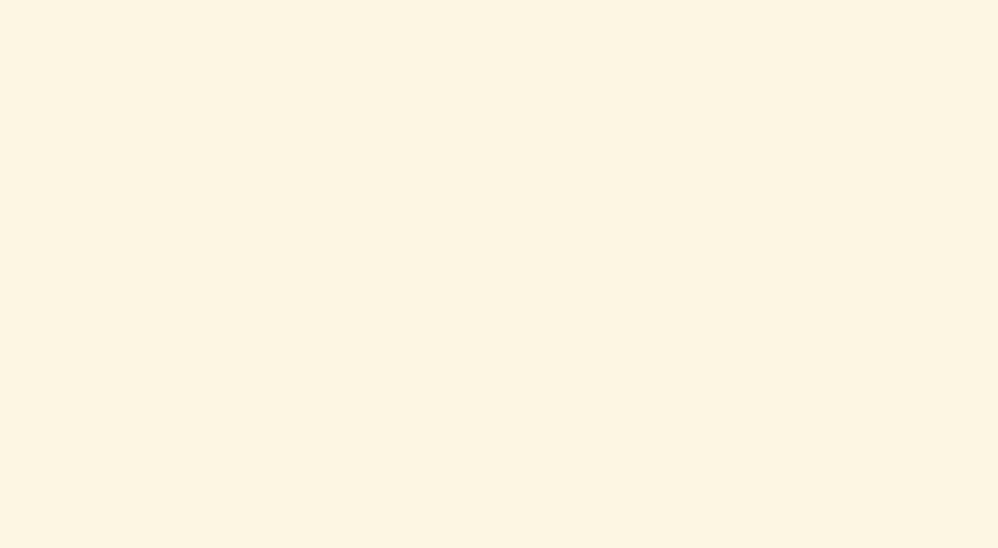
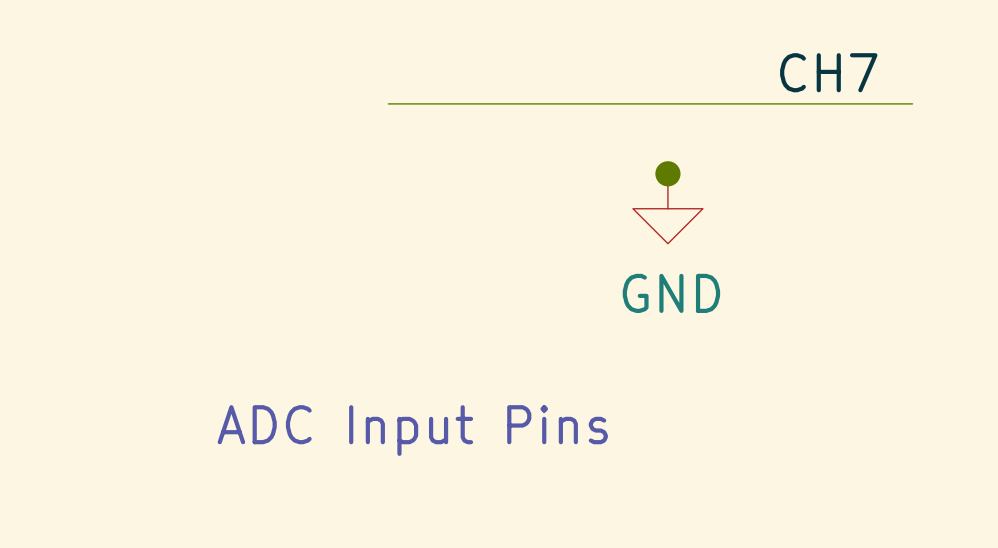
label: none -> CH7 (828, 72)
wire: none -> (388, 103) (912, 103)
junction: none -> (667, 173)
power symbol: none -> GND (667, 208)
text: none -> ADC Input Pins (412, 430)

